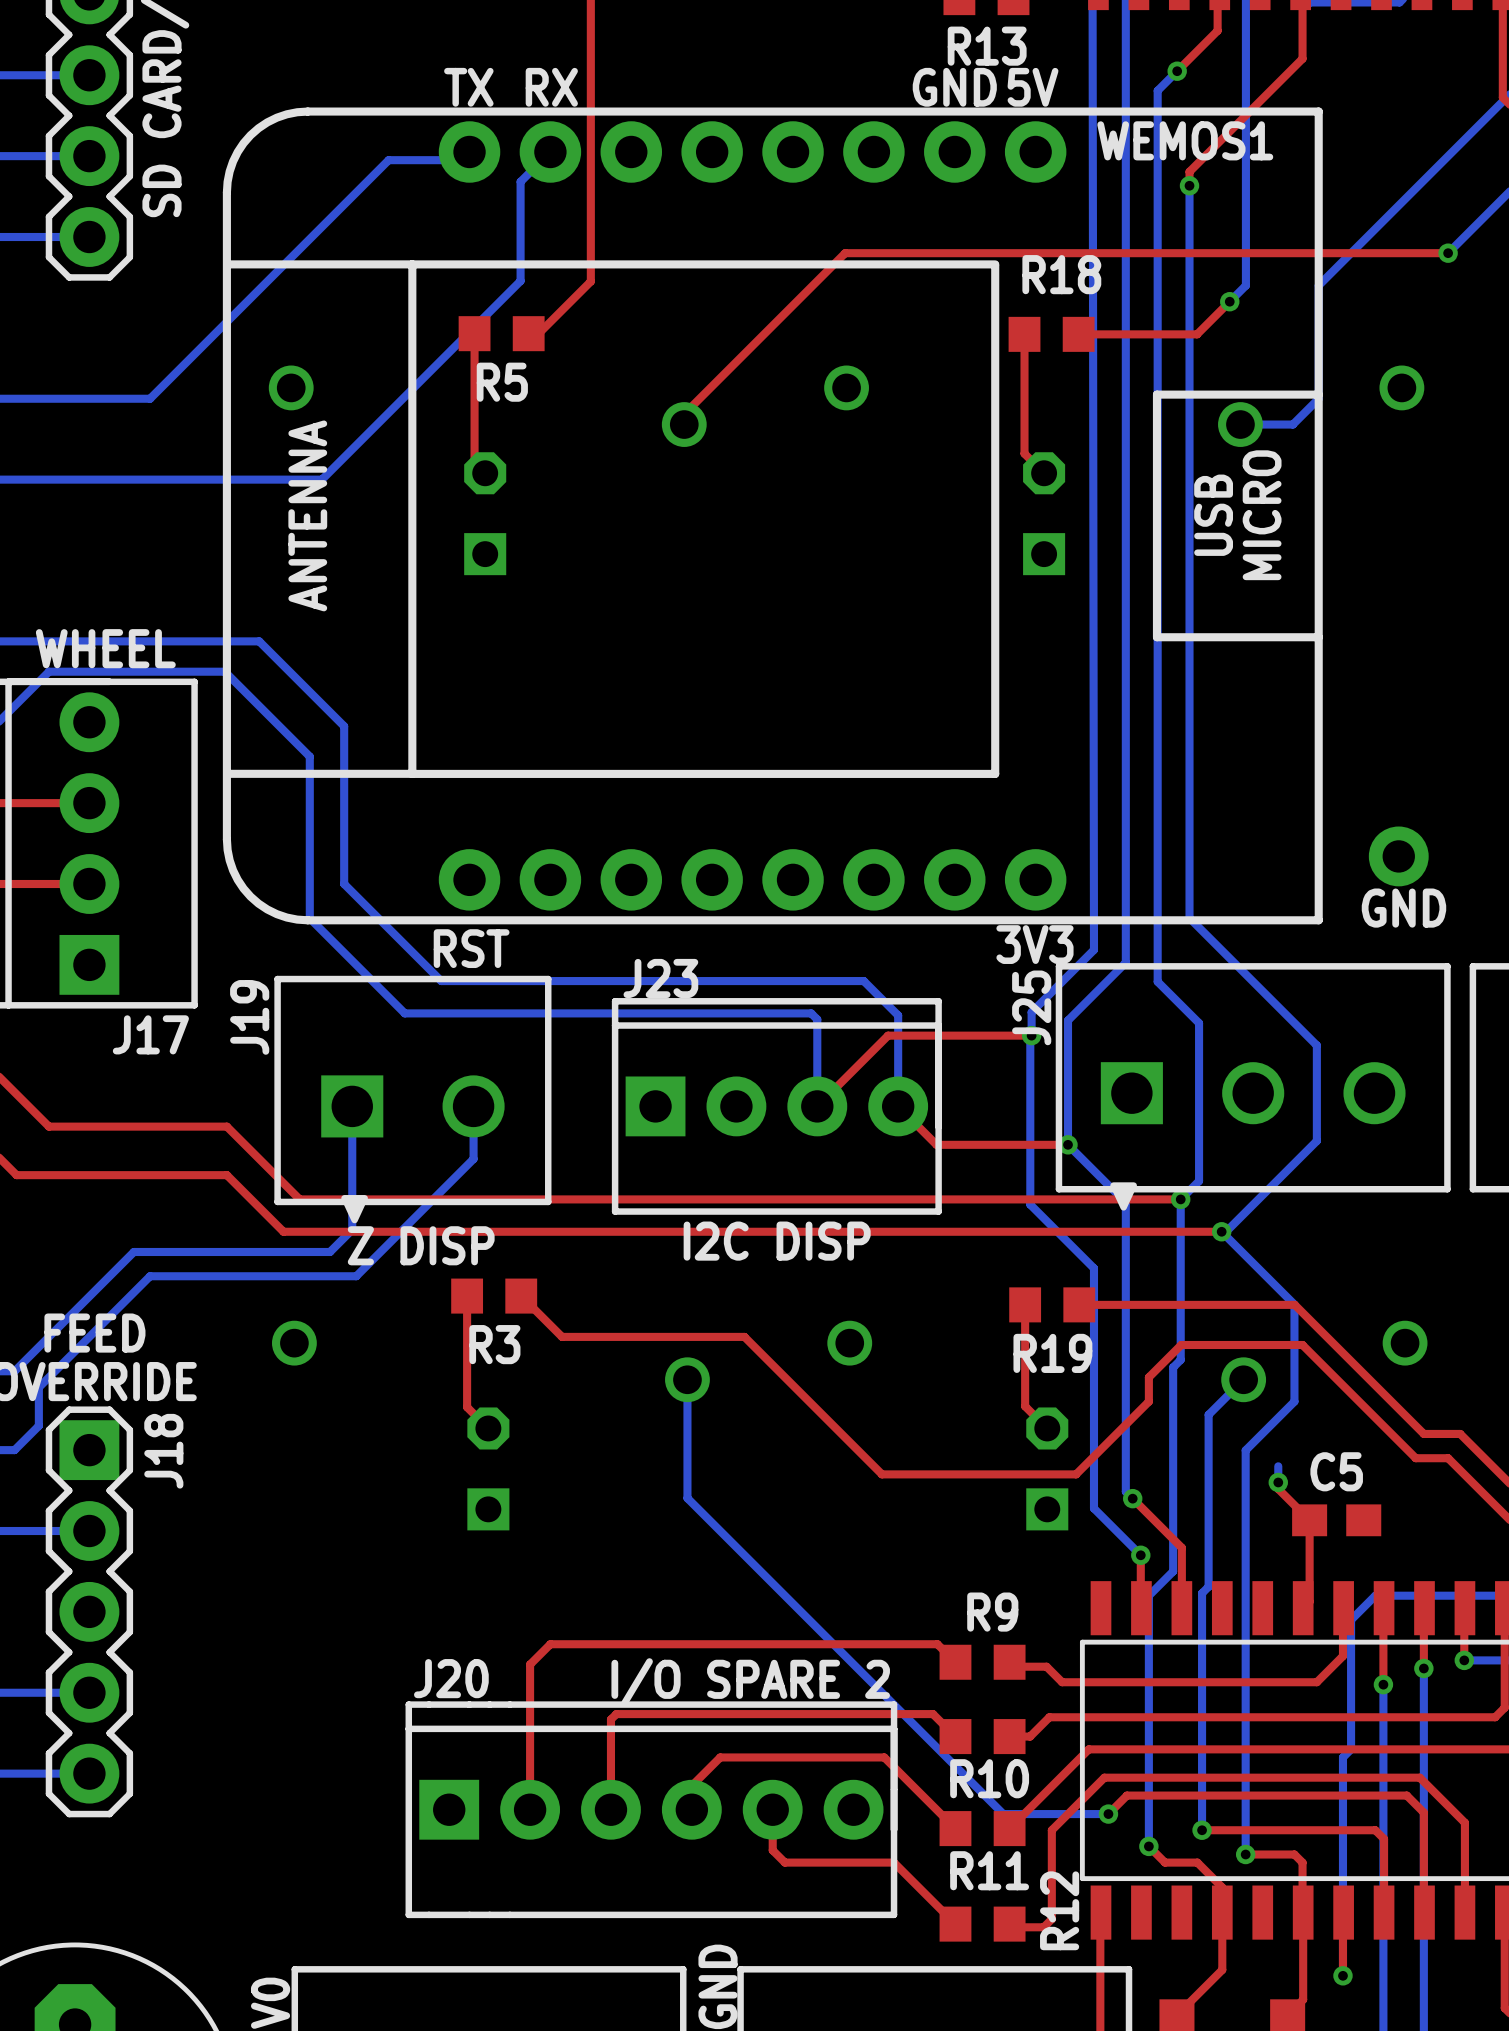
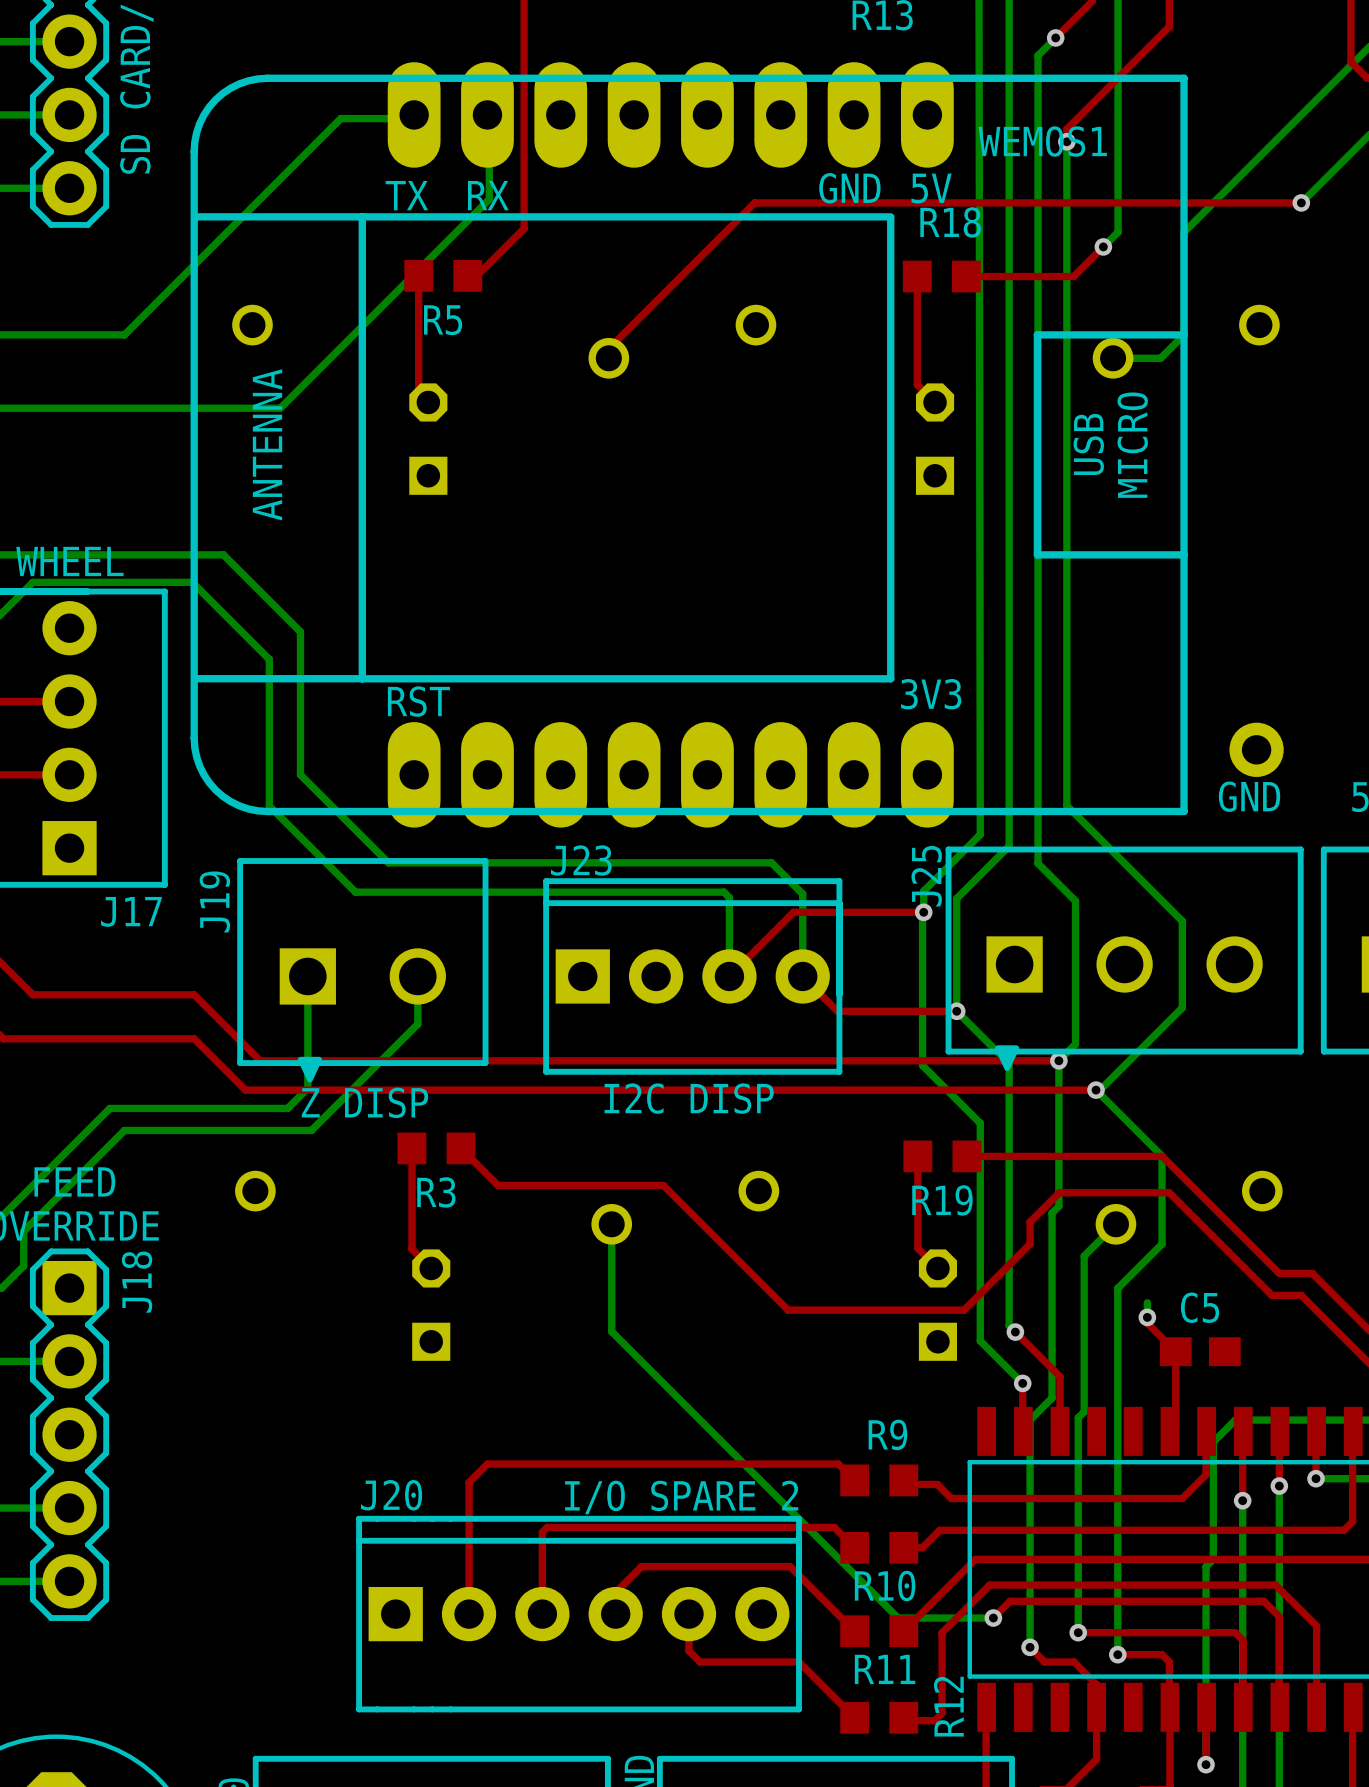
WEMOS1 footprint: [222, 107, 1323, 925] -> [190, 62, 1188, 828]
bottom track: (550, 151) (520, 181) (520, 280) -> (487, 114) (489, 116) (489, 199) (460, 228)
J25 name position: J25 (1031, 1007) -> J25 (926, 876)

